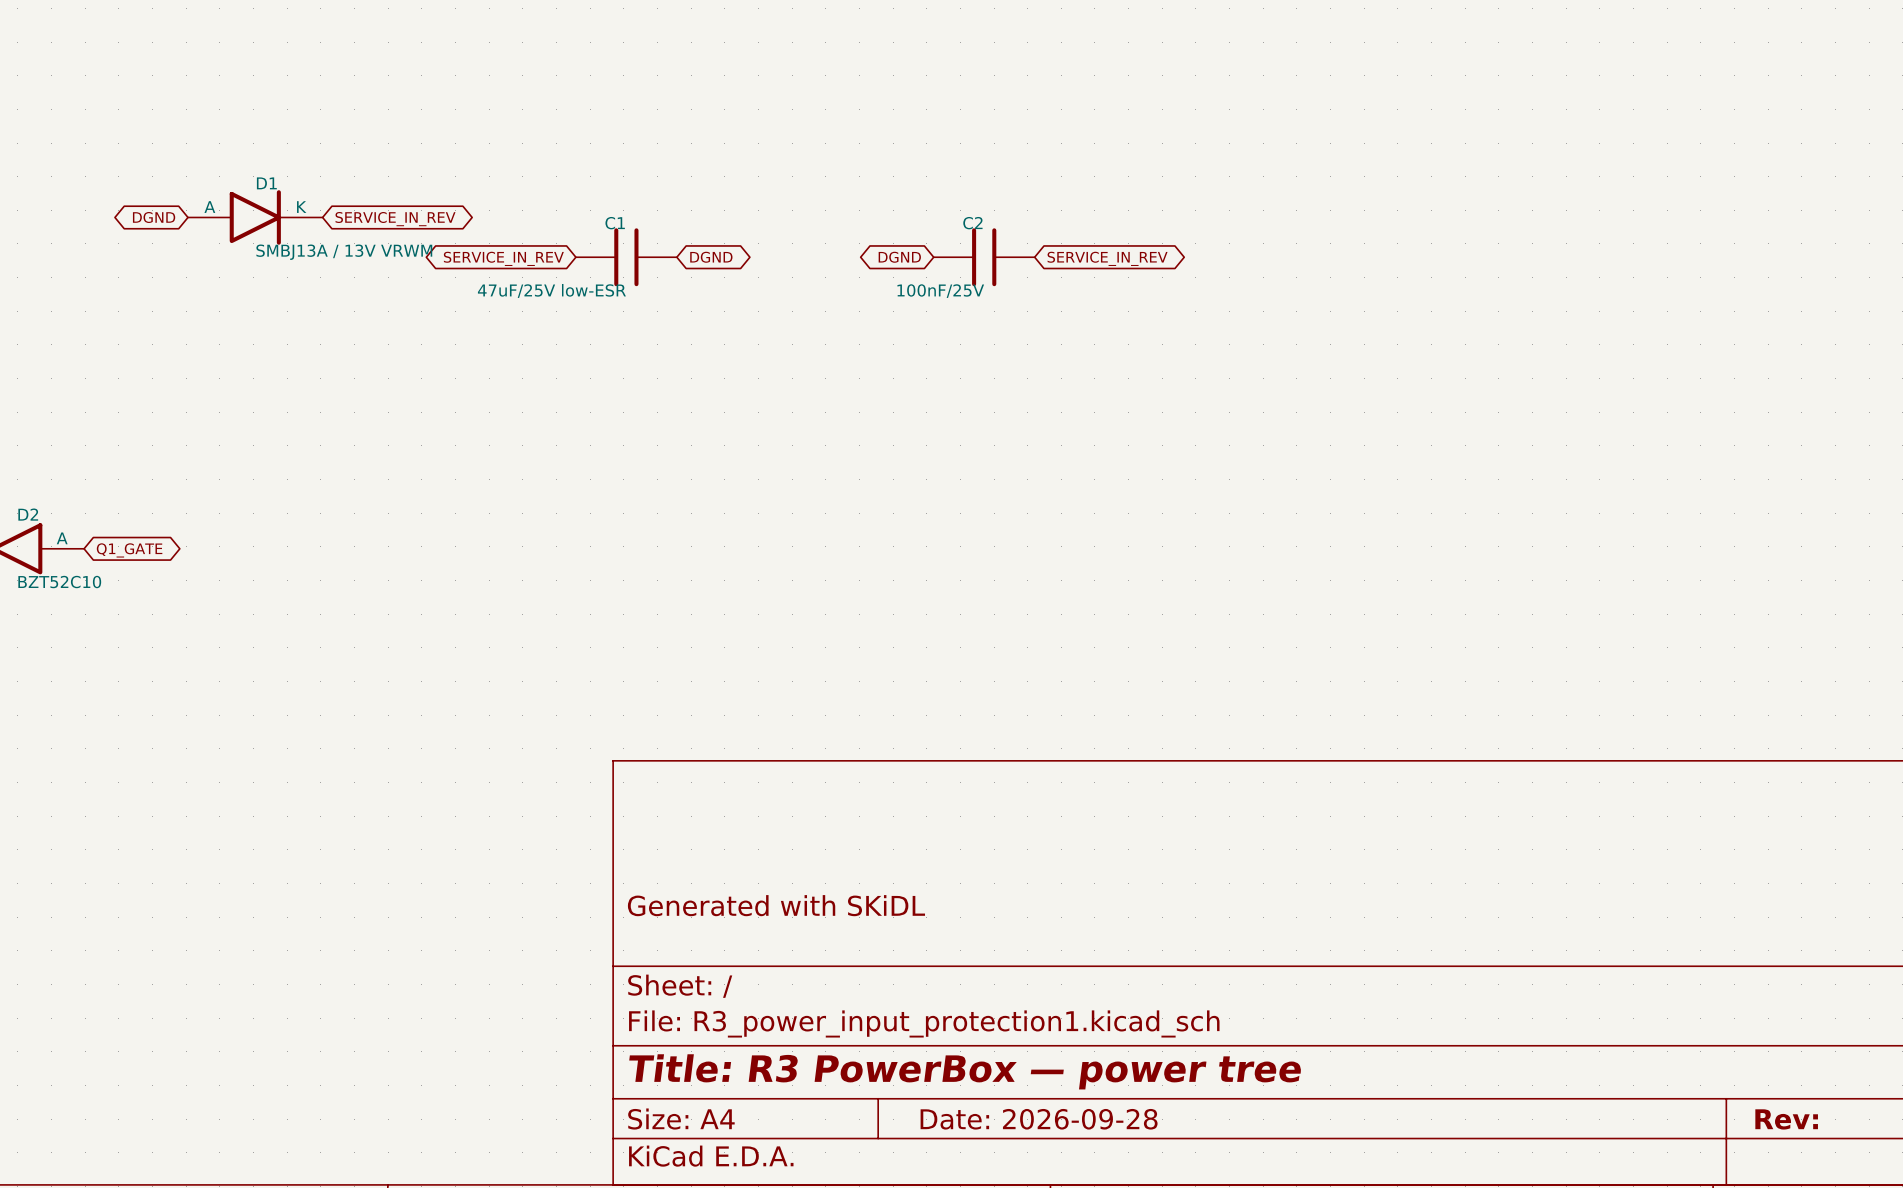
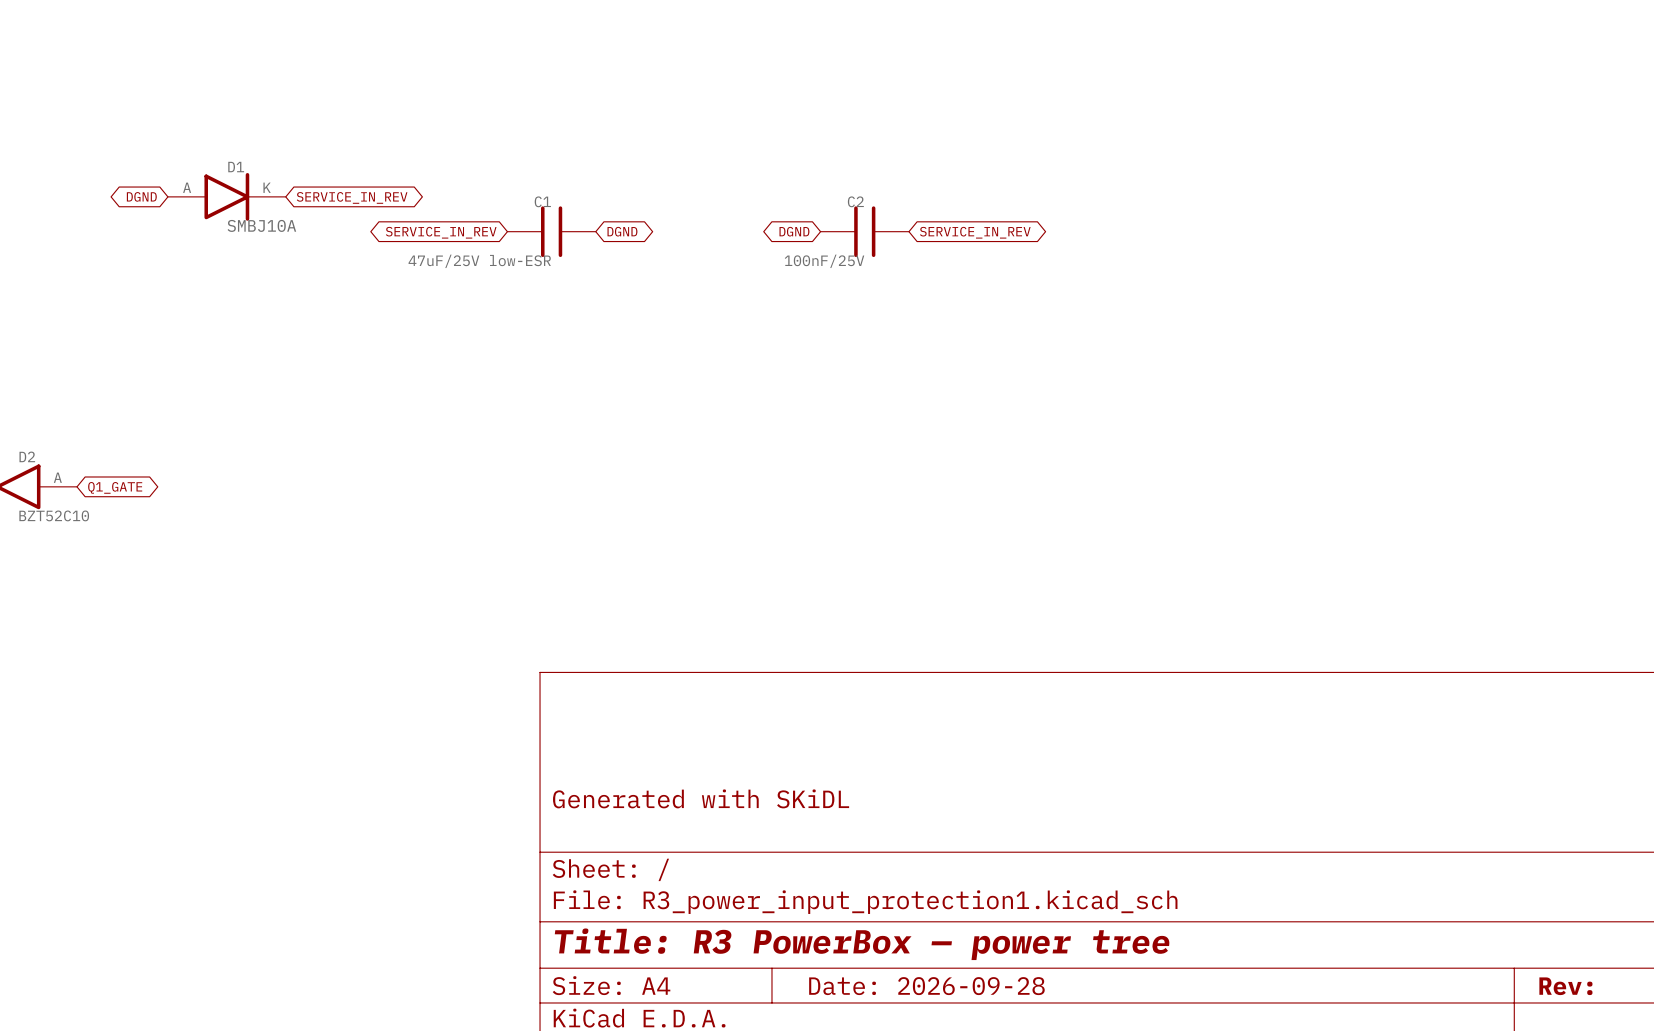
D1 value: SMBJ13A / 13V VRWM (344, 252) -> SMBJ10A (261, 225)

